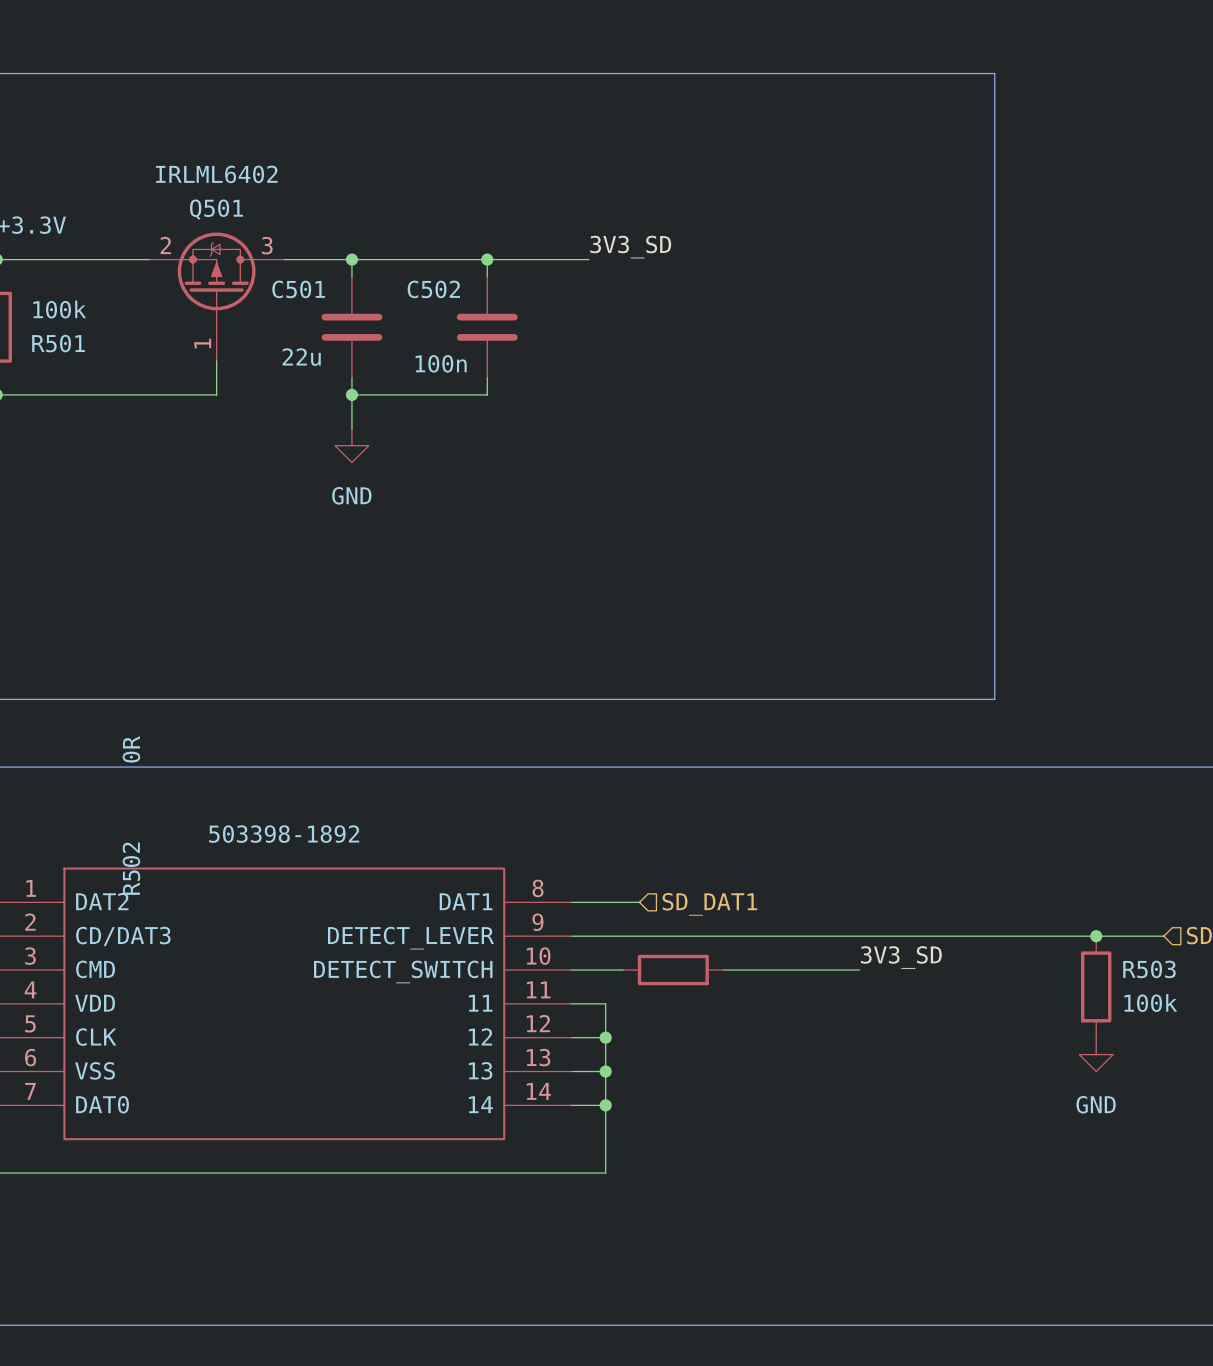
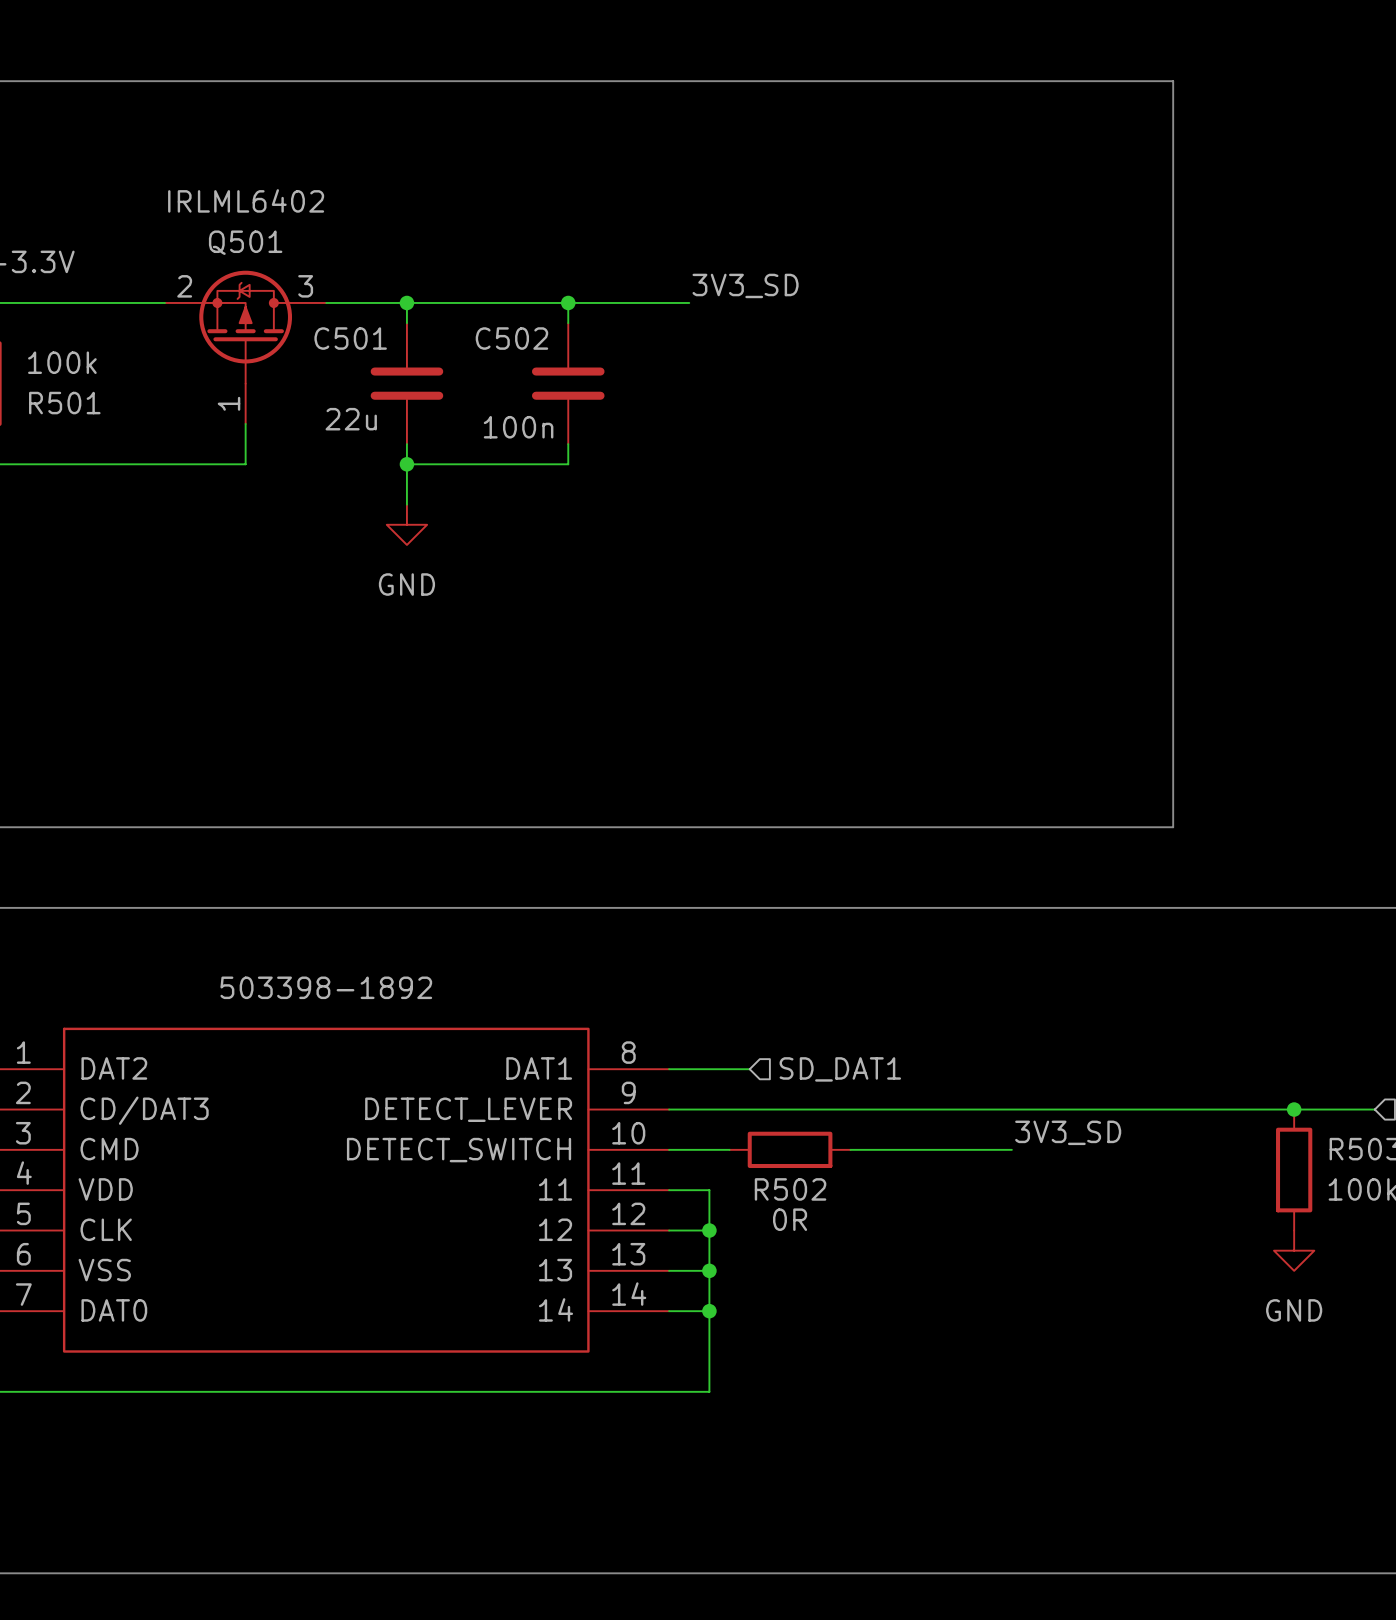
R502 value rotation: 0° (131, 749) -> 90° clockwise (790, 1219)
R502 value position: 0R (131, 749) -> 0R (790, 1219)
R502 name rotation: 0° (131, 868) -> 90° clockwise (790, 1189)
R502 name position: R502 (131, 868) -> R502 (790, 1189)

